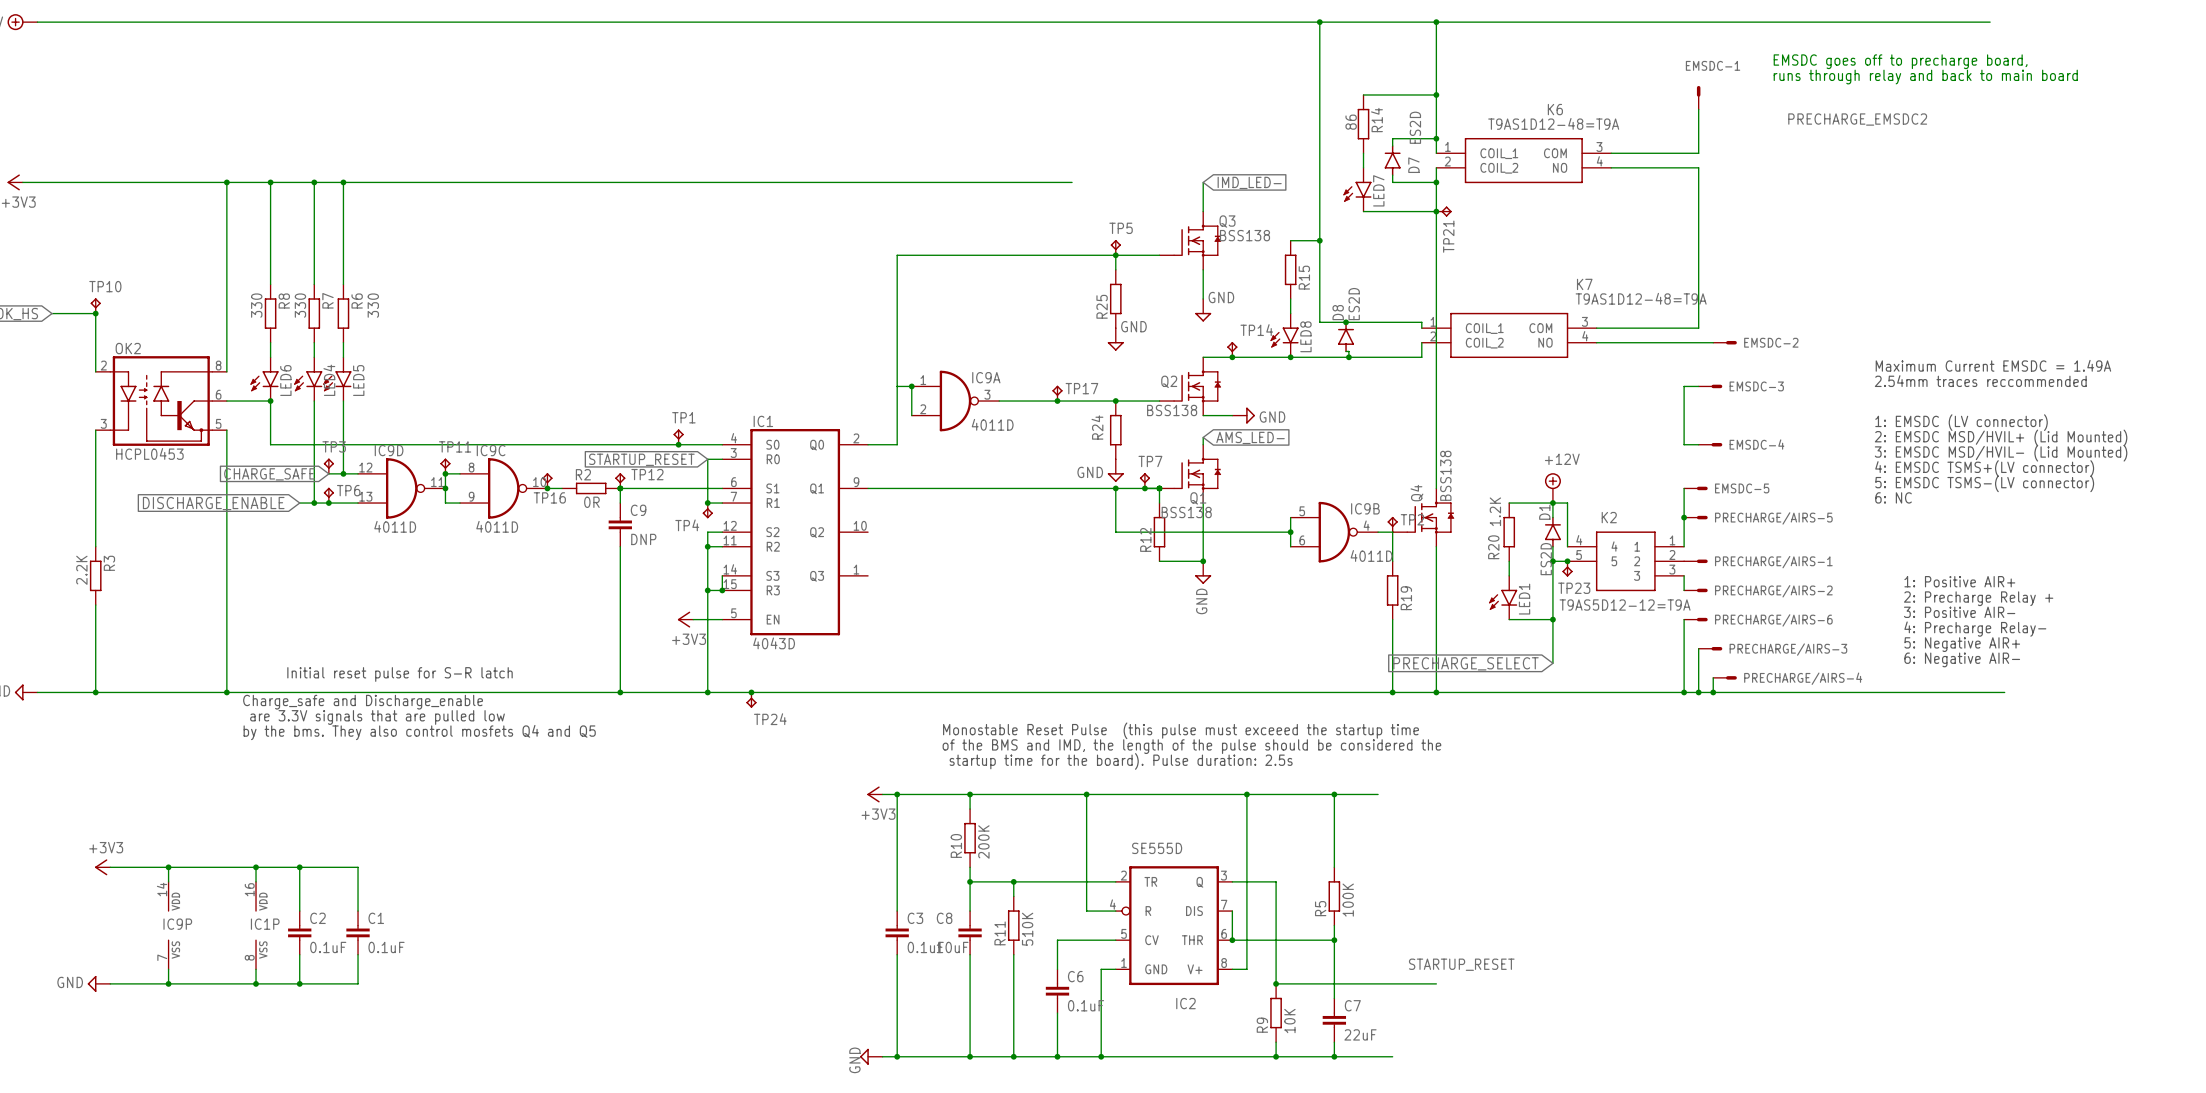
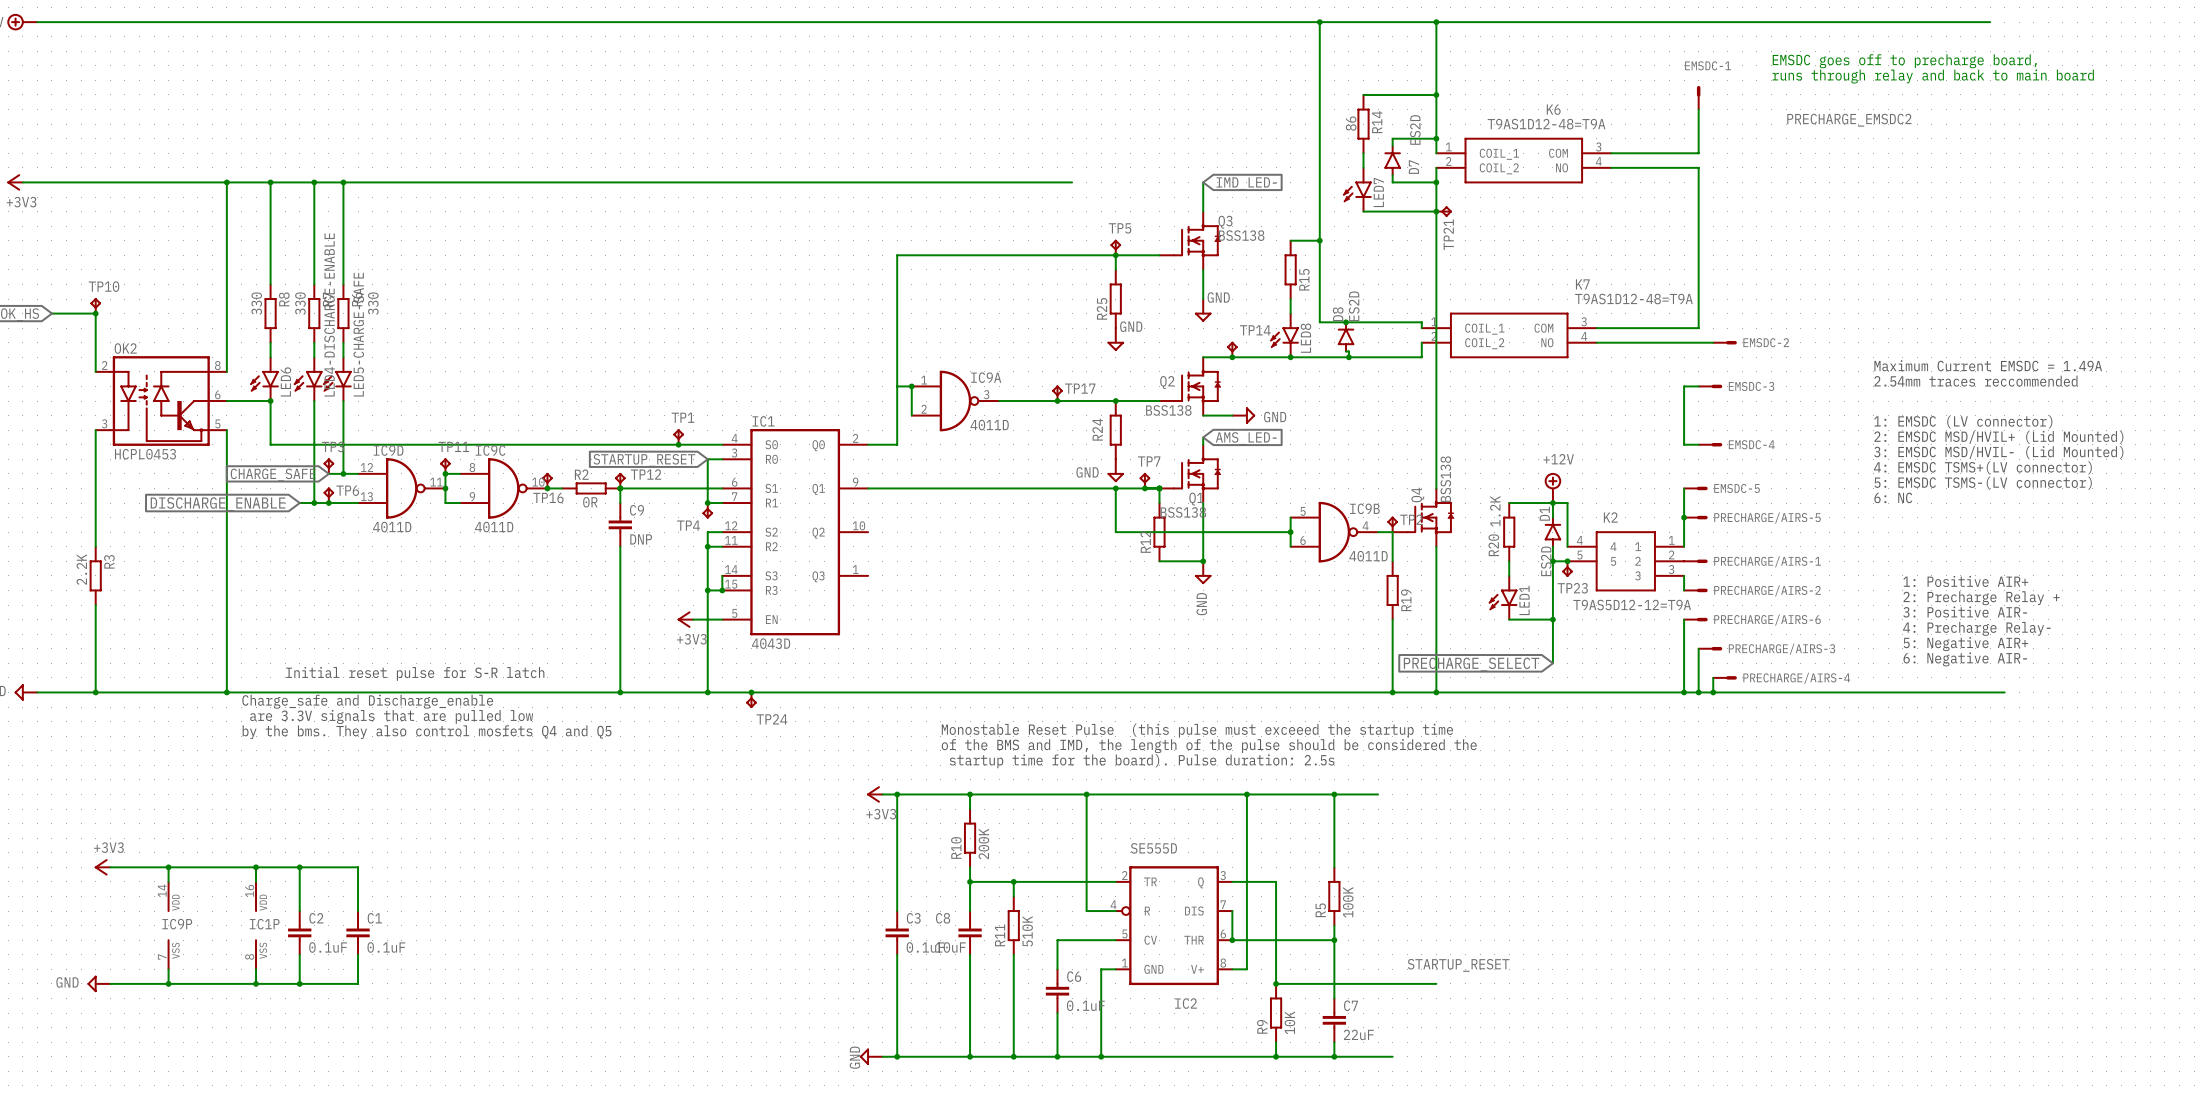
LED4 name: LED4 (329, 380) -> LED4-DISCHARGE-ENABLE (329, 314)
LED5 name: LED5 (358, 380) -> LED5-CHARGE-SAFE (358, 334)

